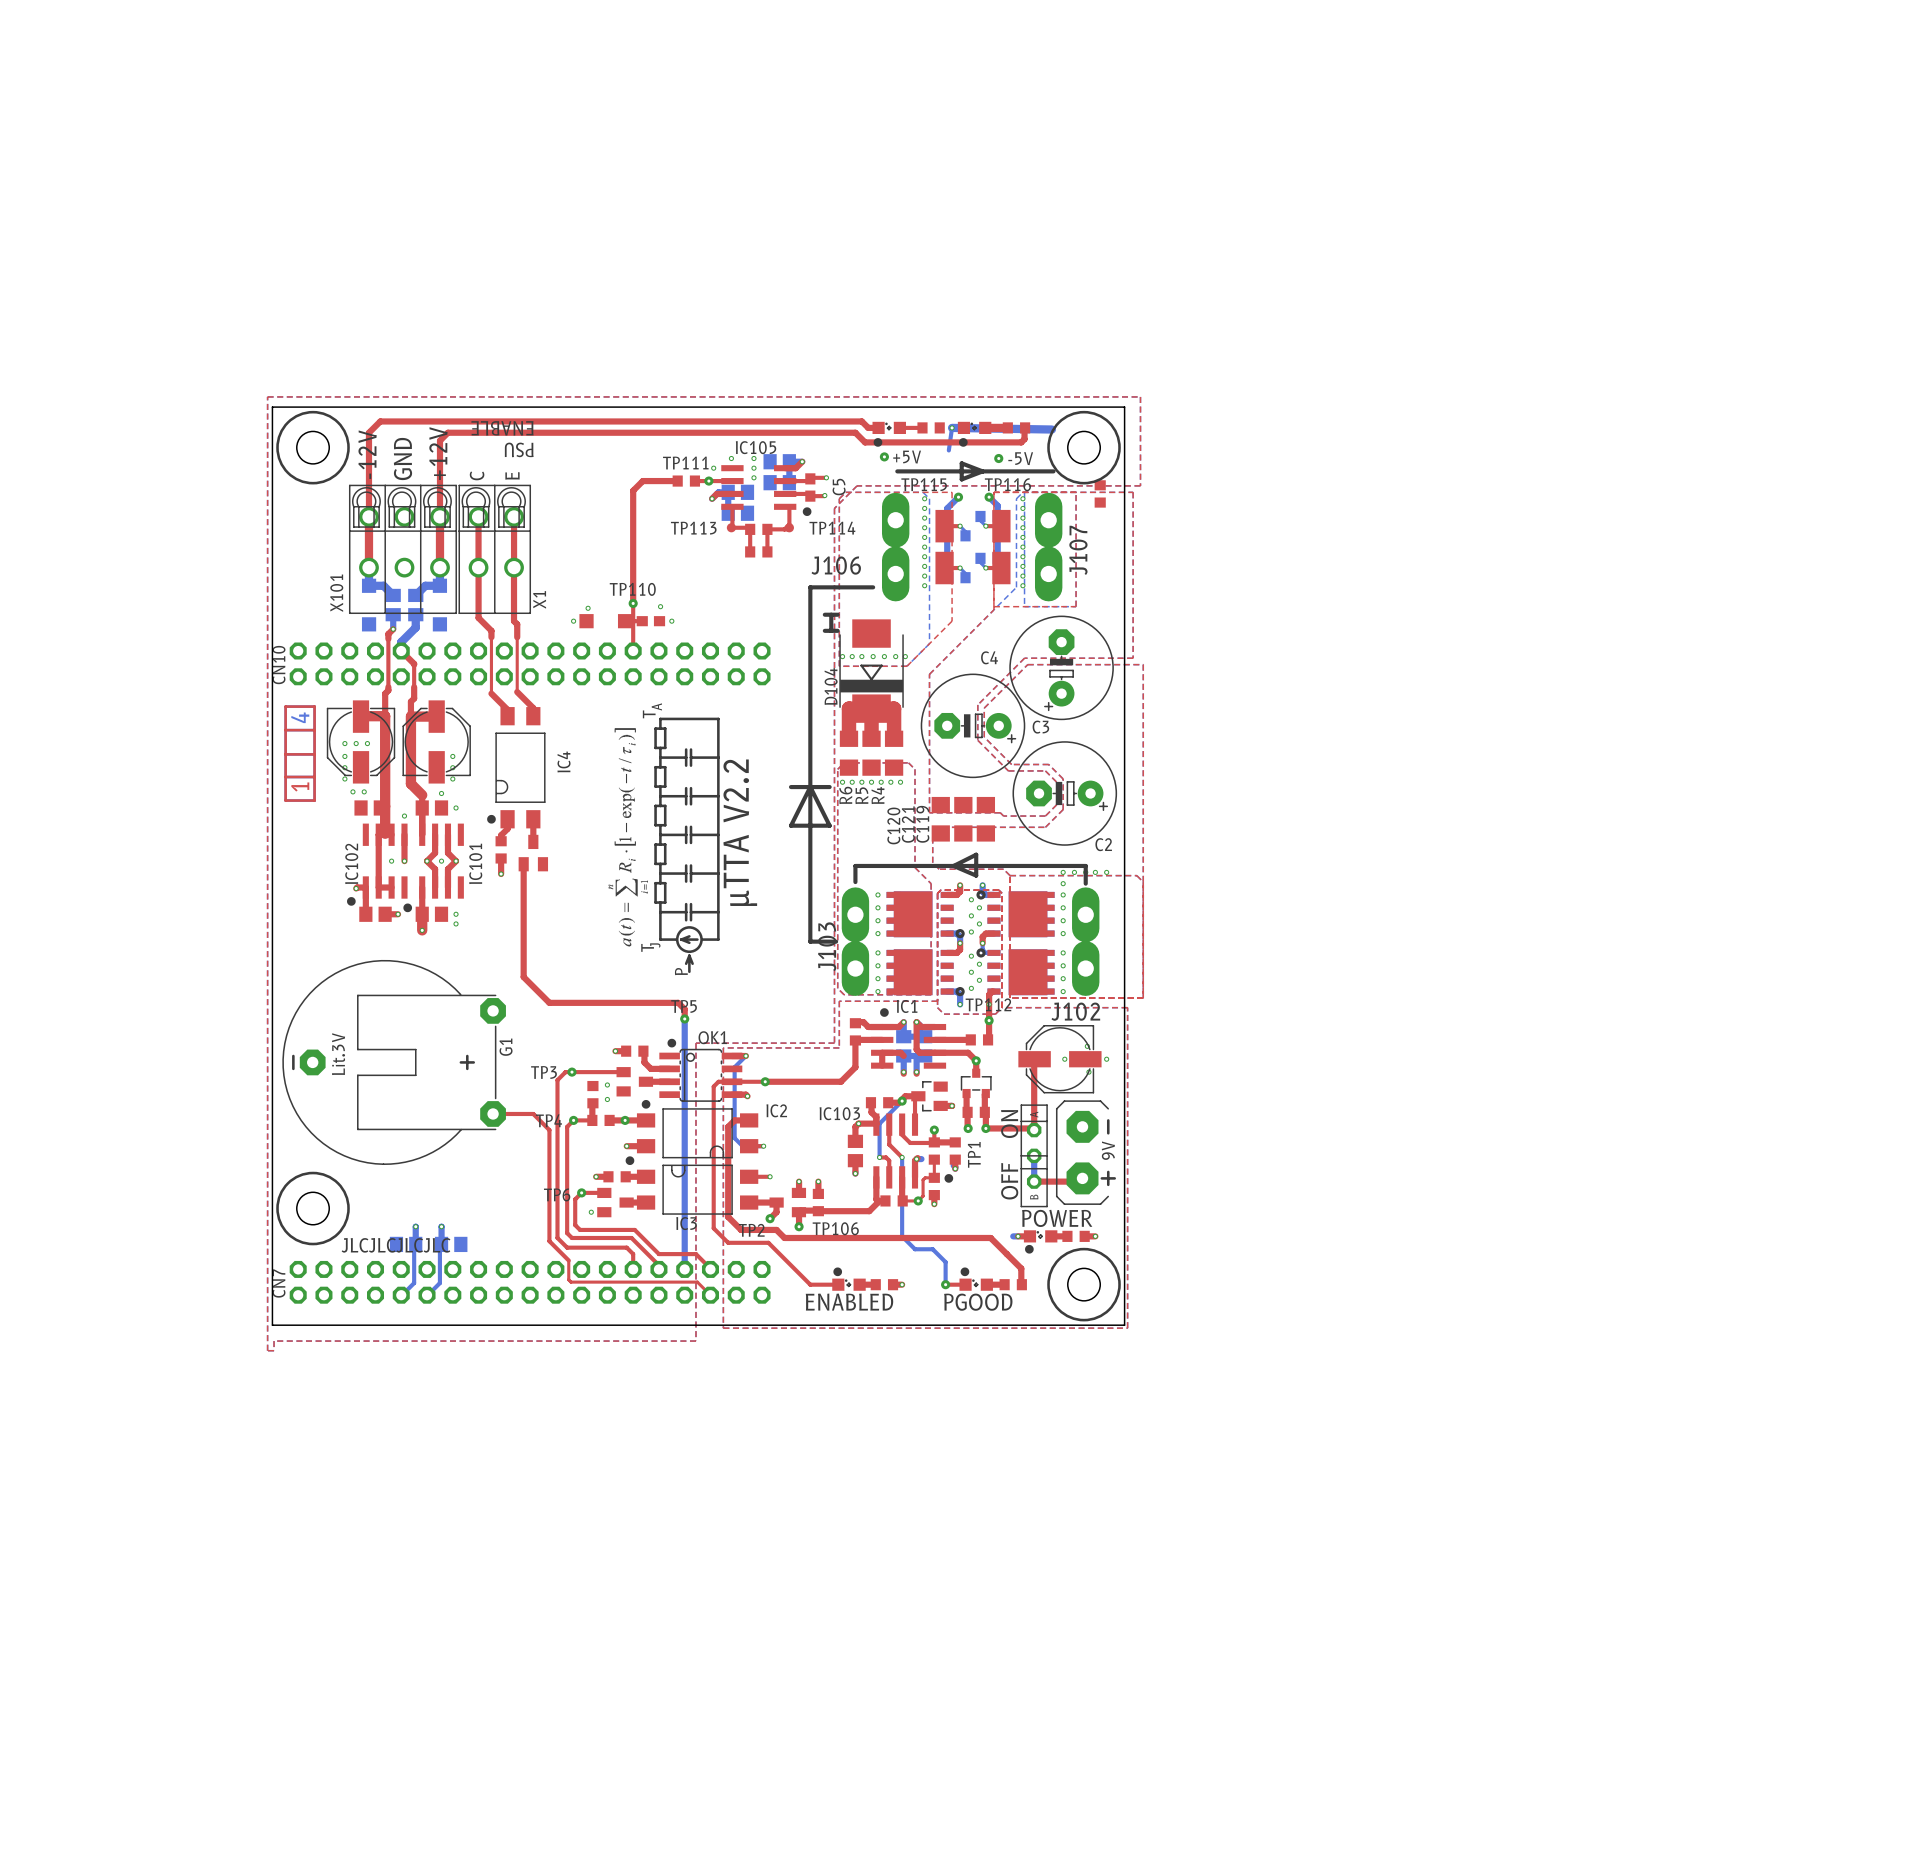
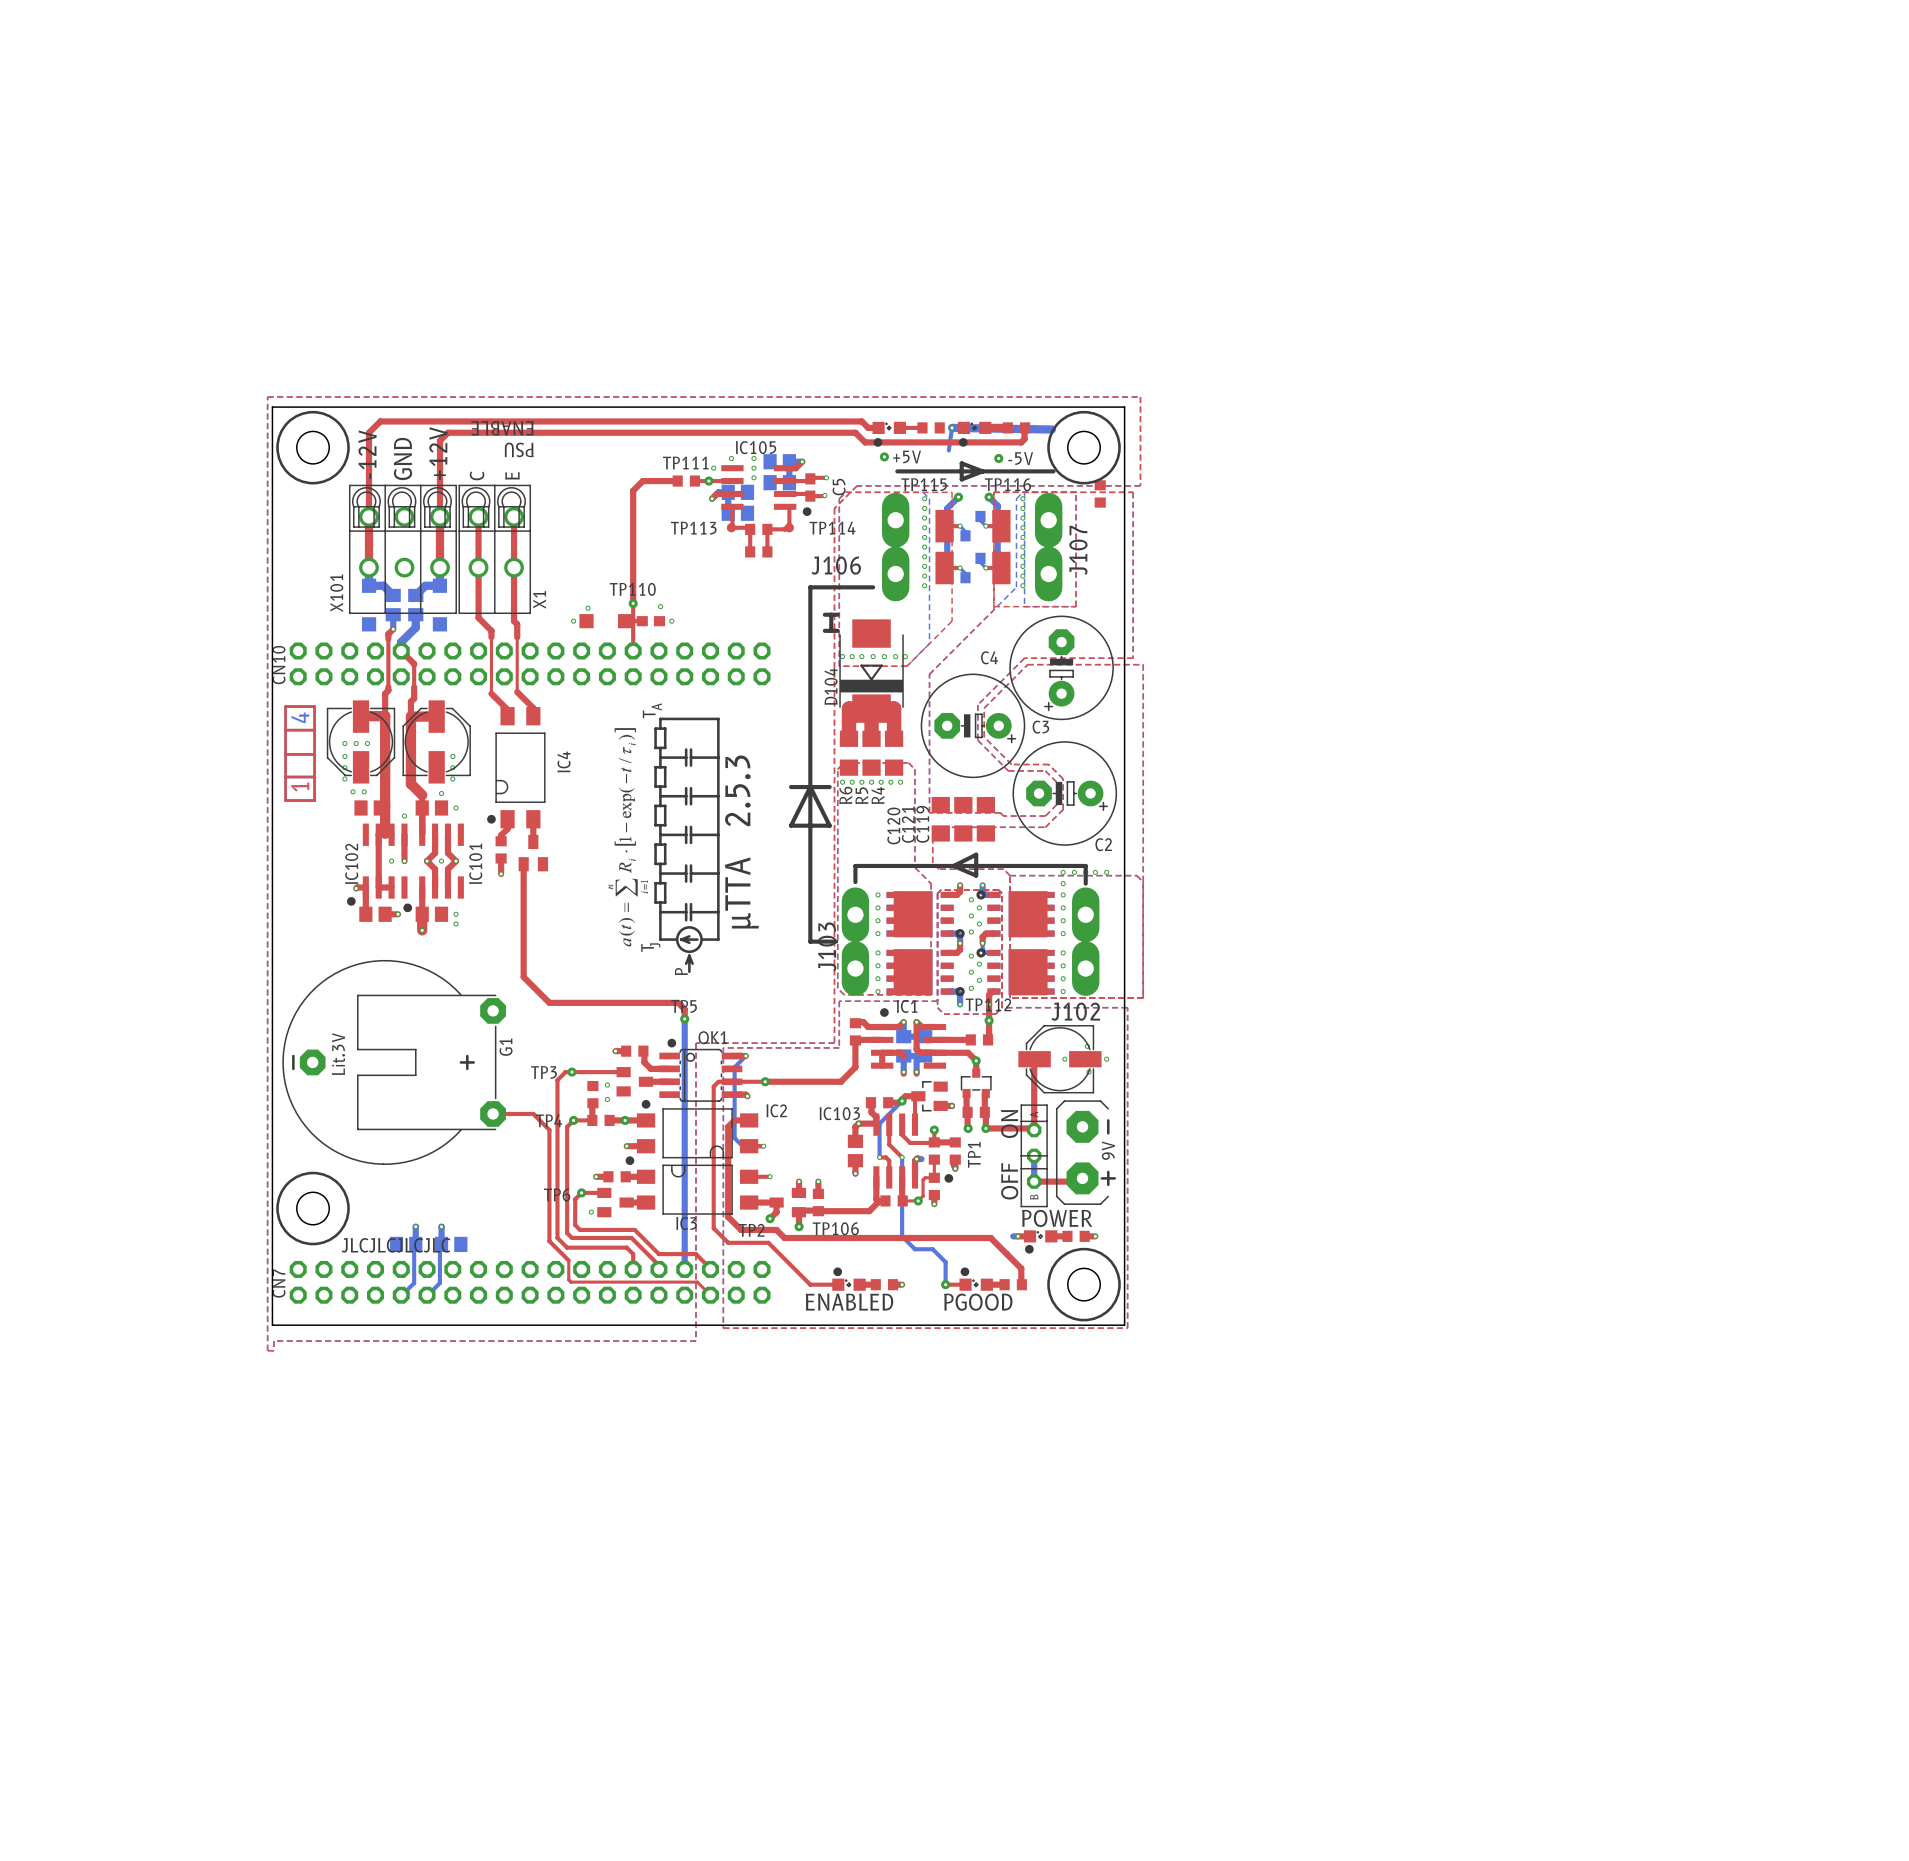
text: none -> 2.5.3 (737, 790)
text: µTTA V2.2 (740, 832) -> µTTA (741, 892)

